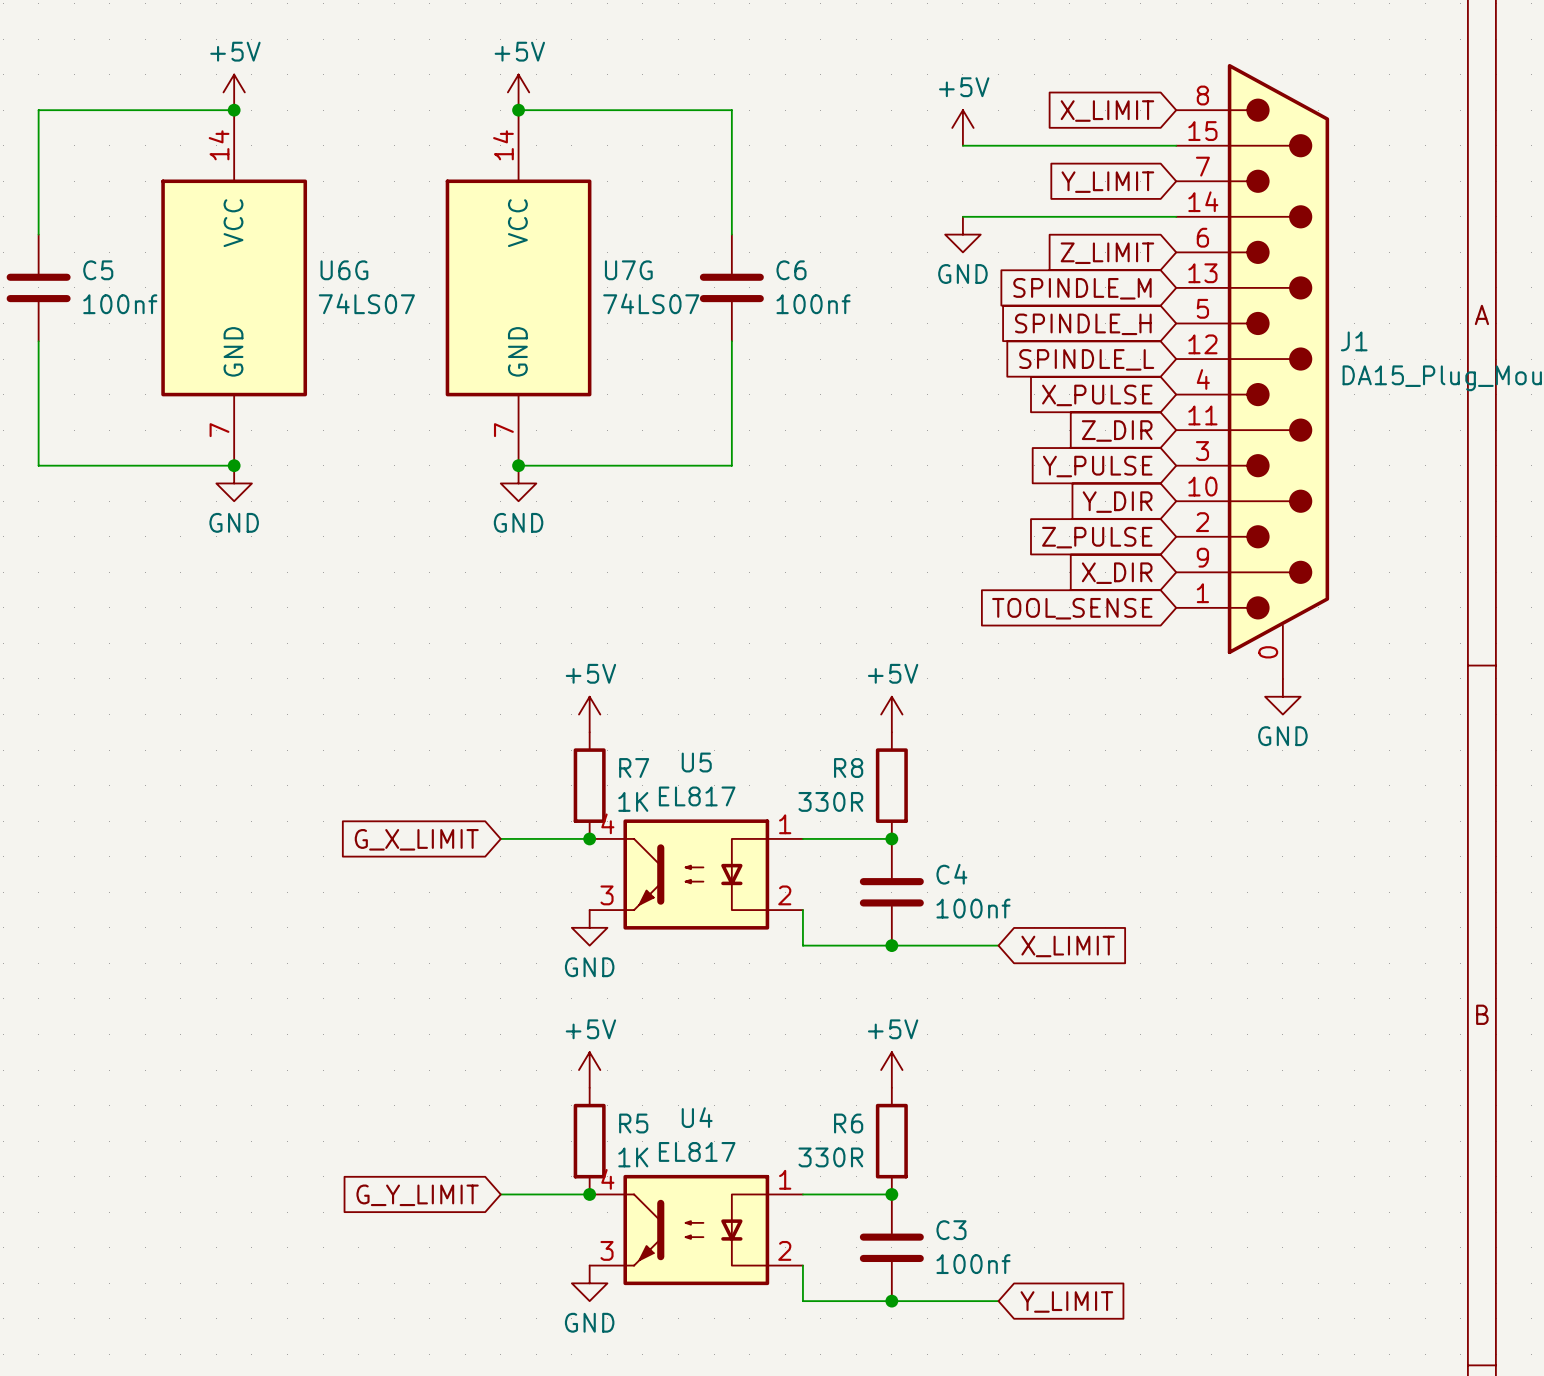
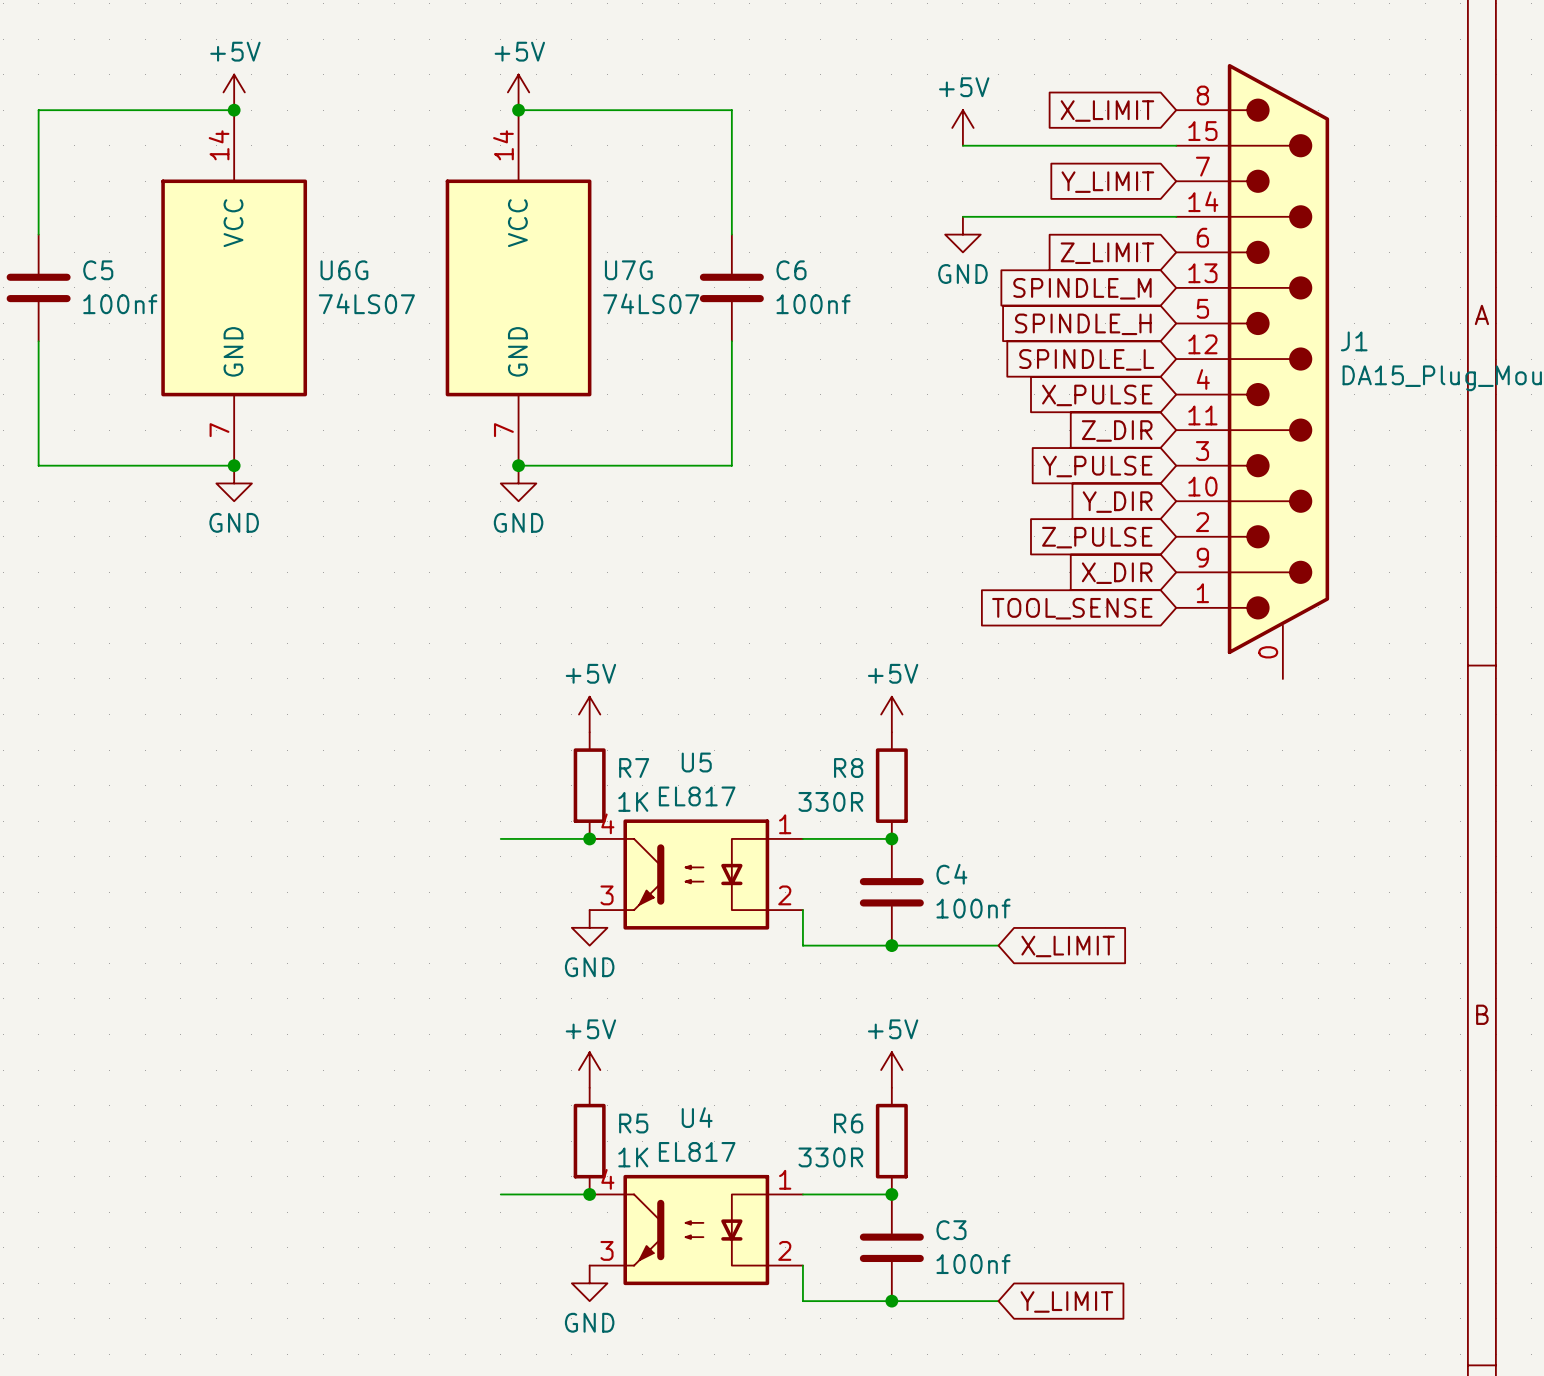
power symbol: GND (1282, 696) -> none
global label: G_X_LIMIT (416, 839) -> none
global label: G_Y_LIMIT (417, 1195) -> none

